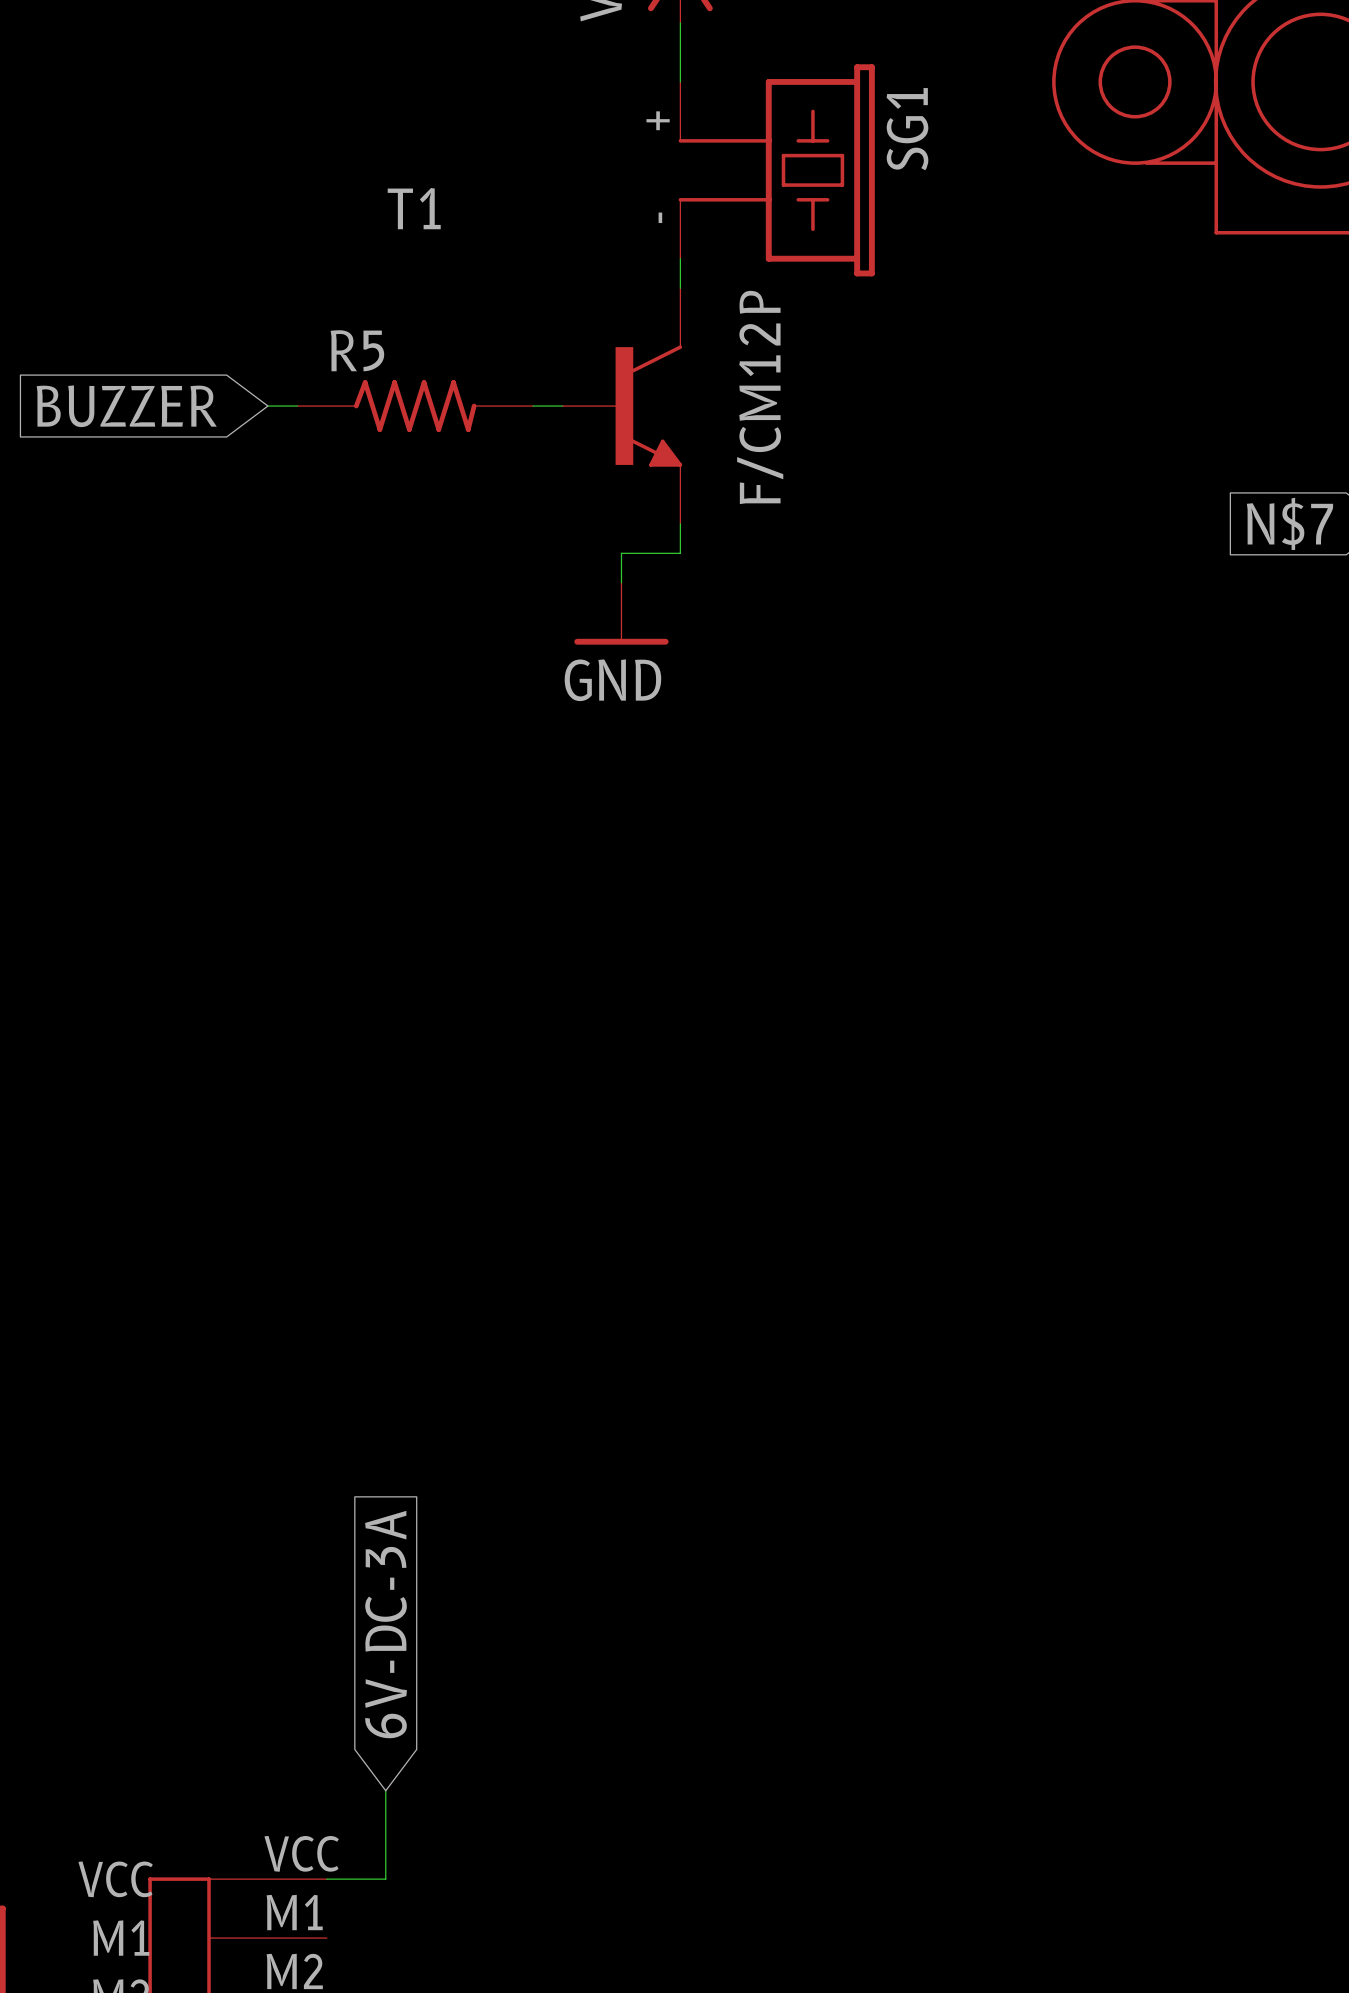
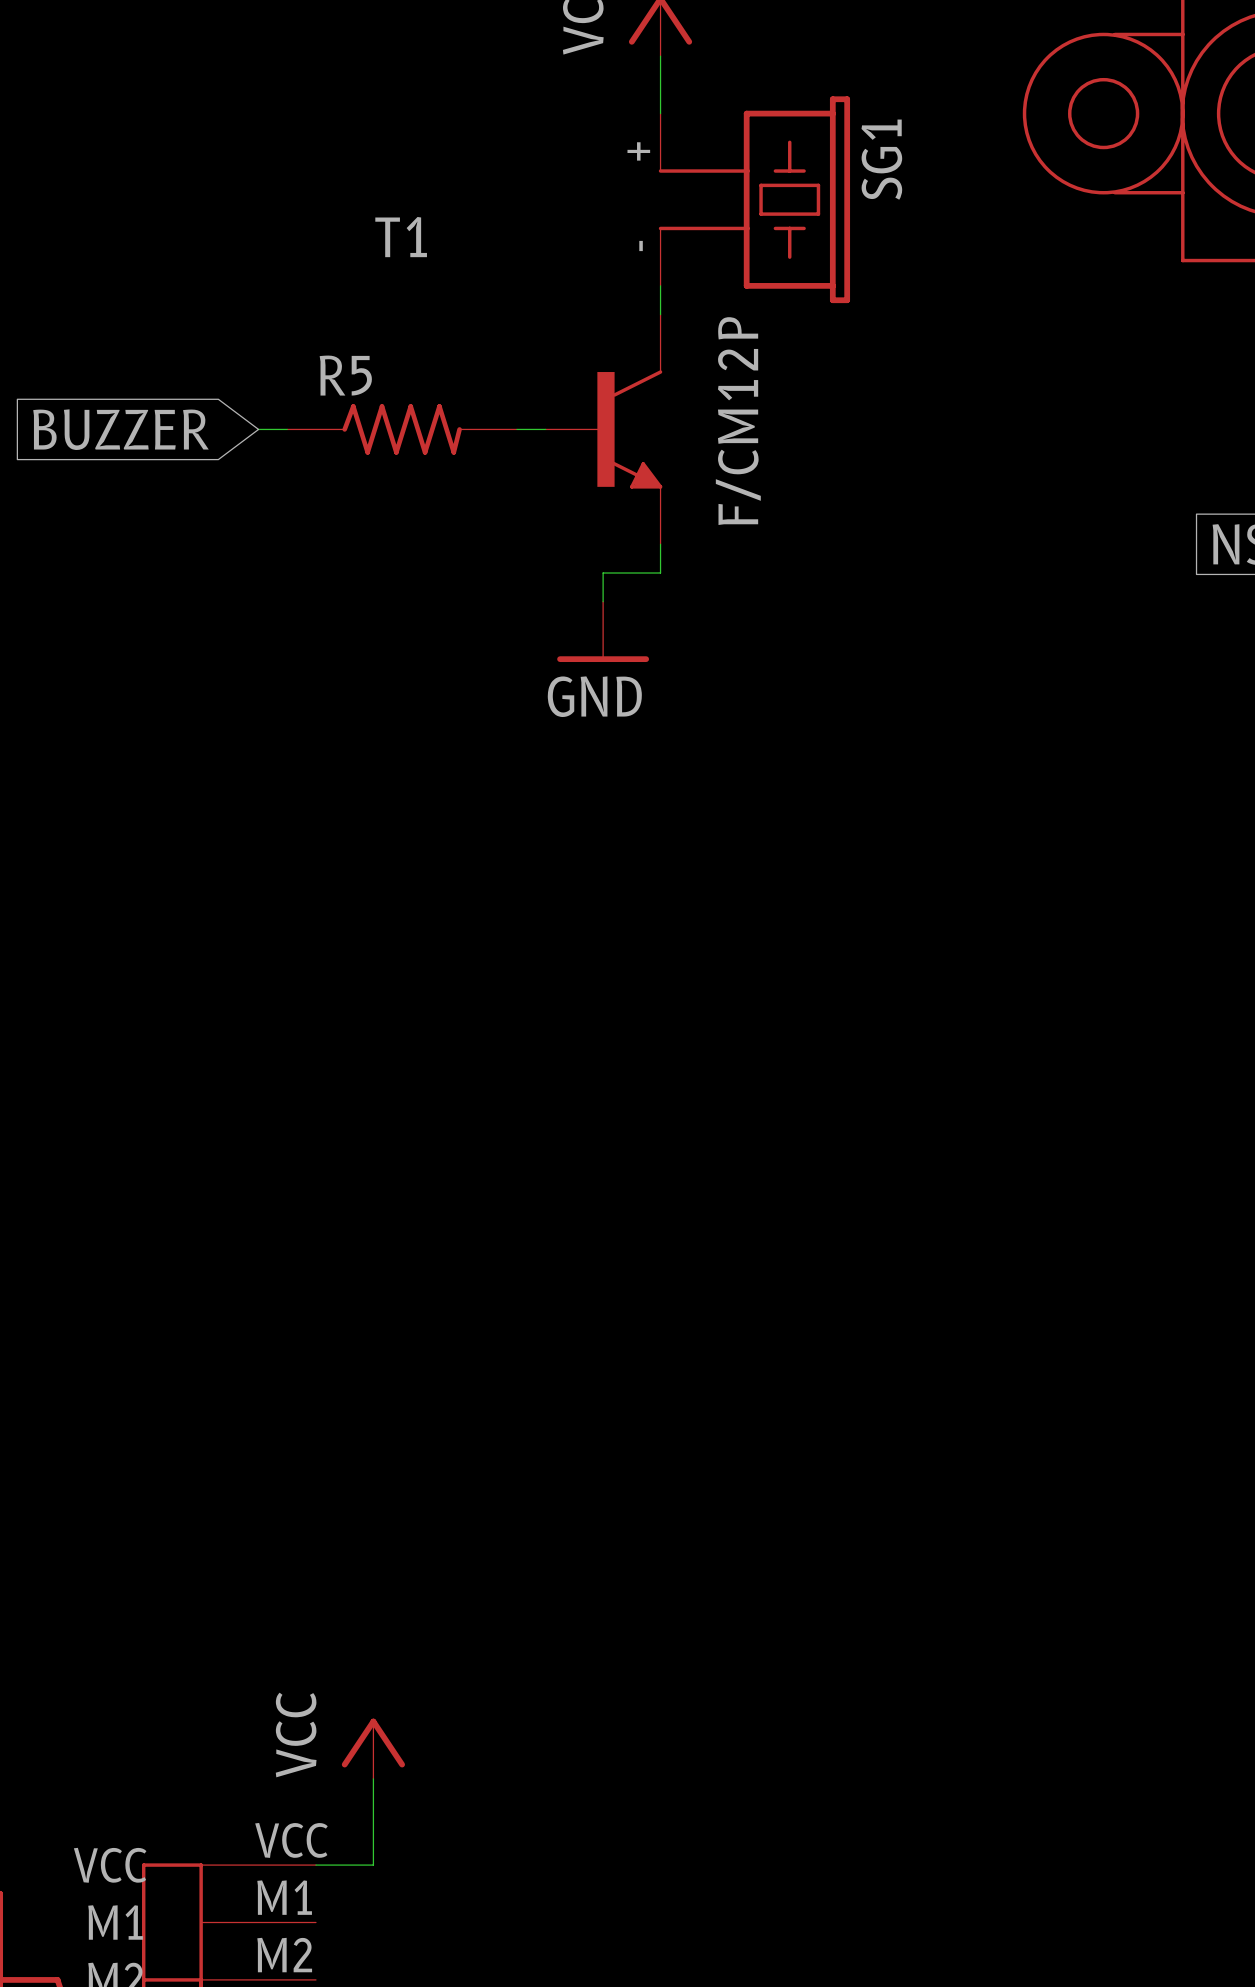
global label: 6V-DC-3A (386, 1624) -> none
power symbol: none -> VCC (373, 1748)

